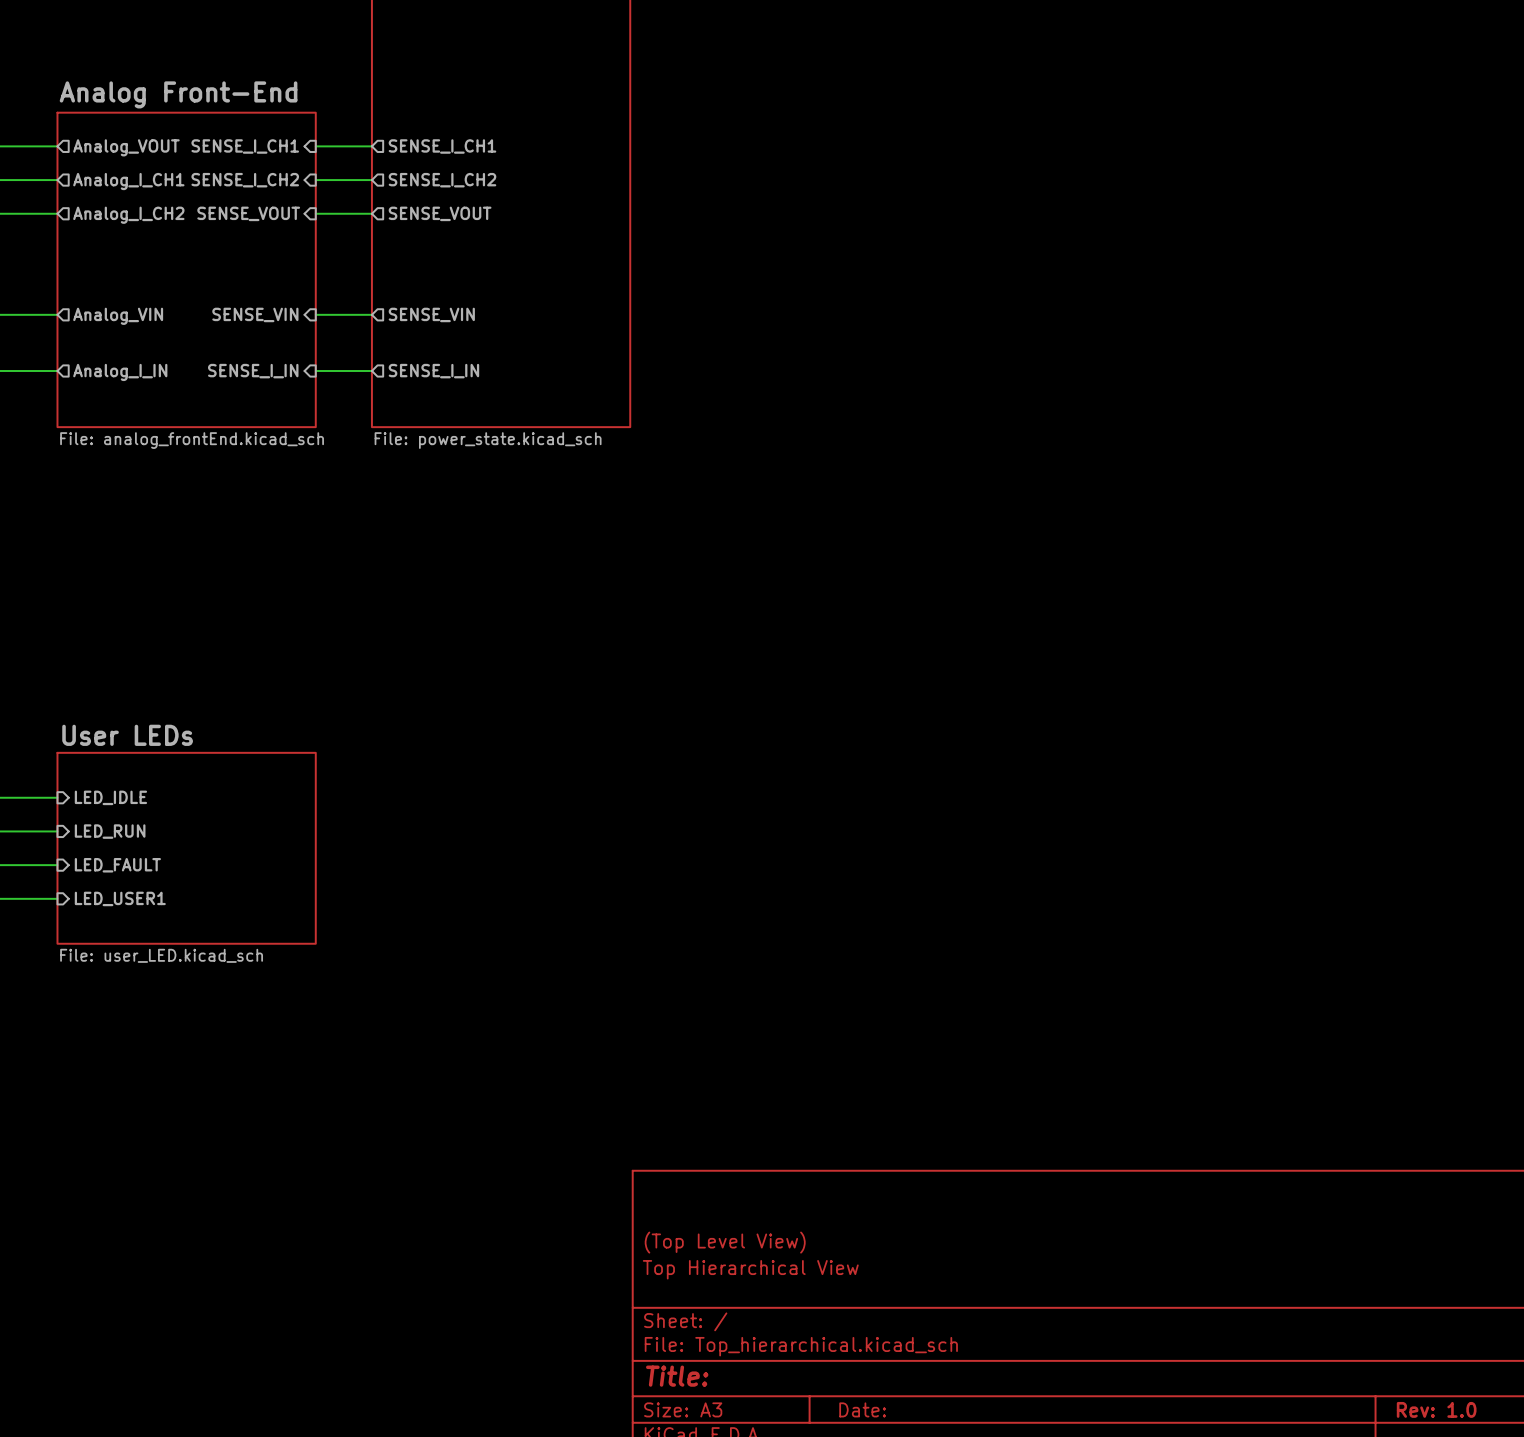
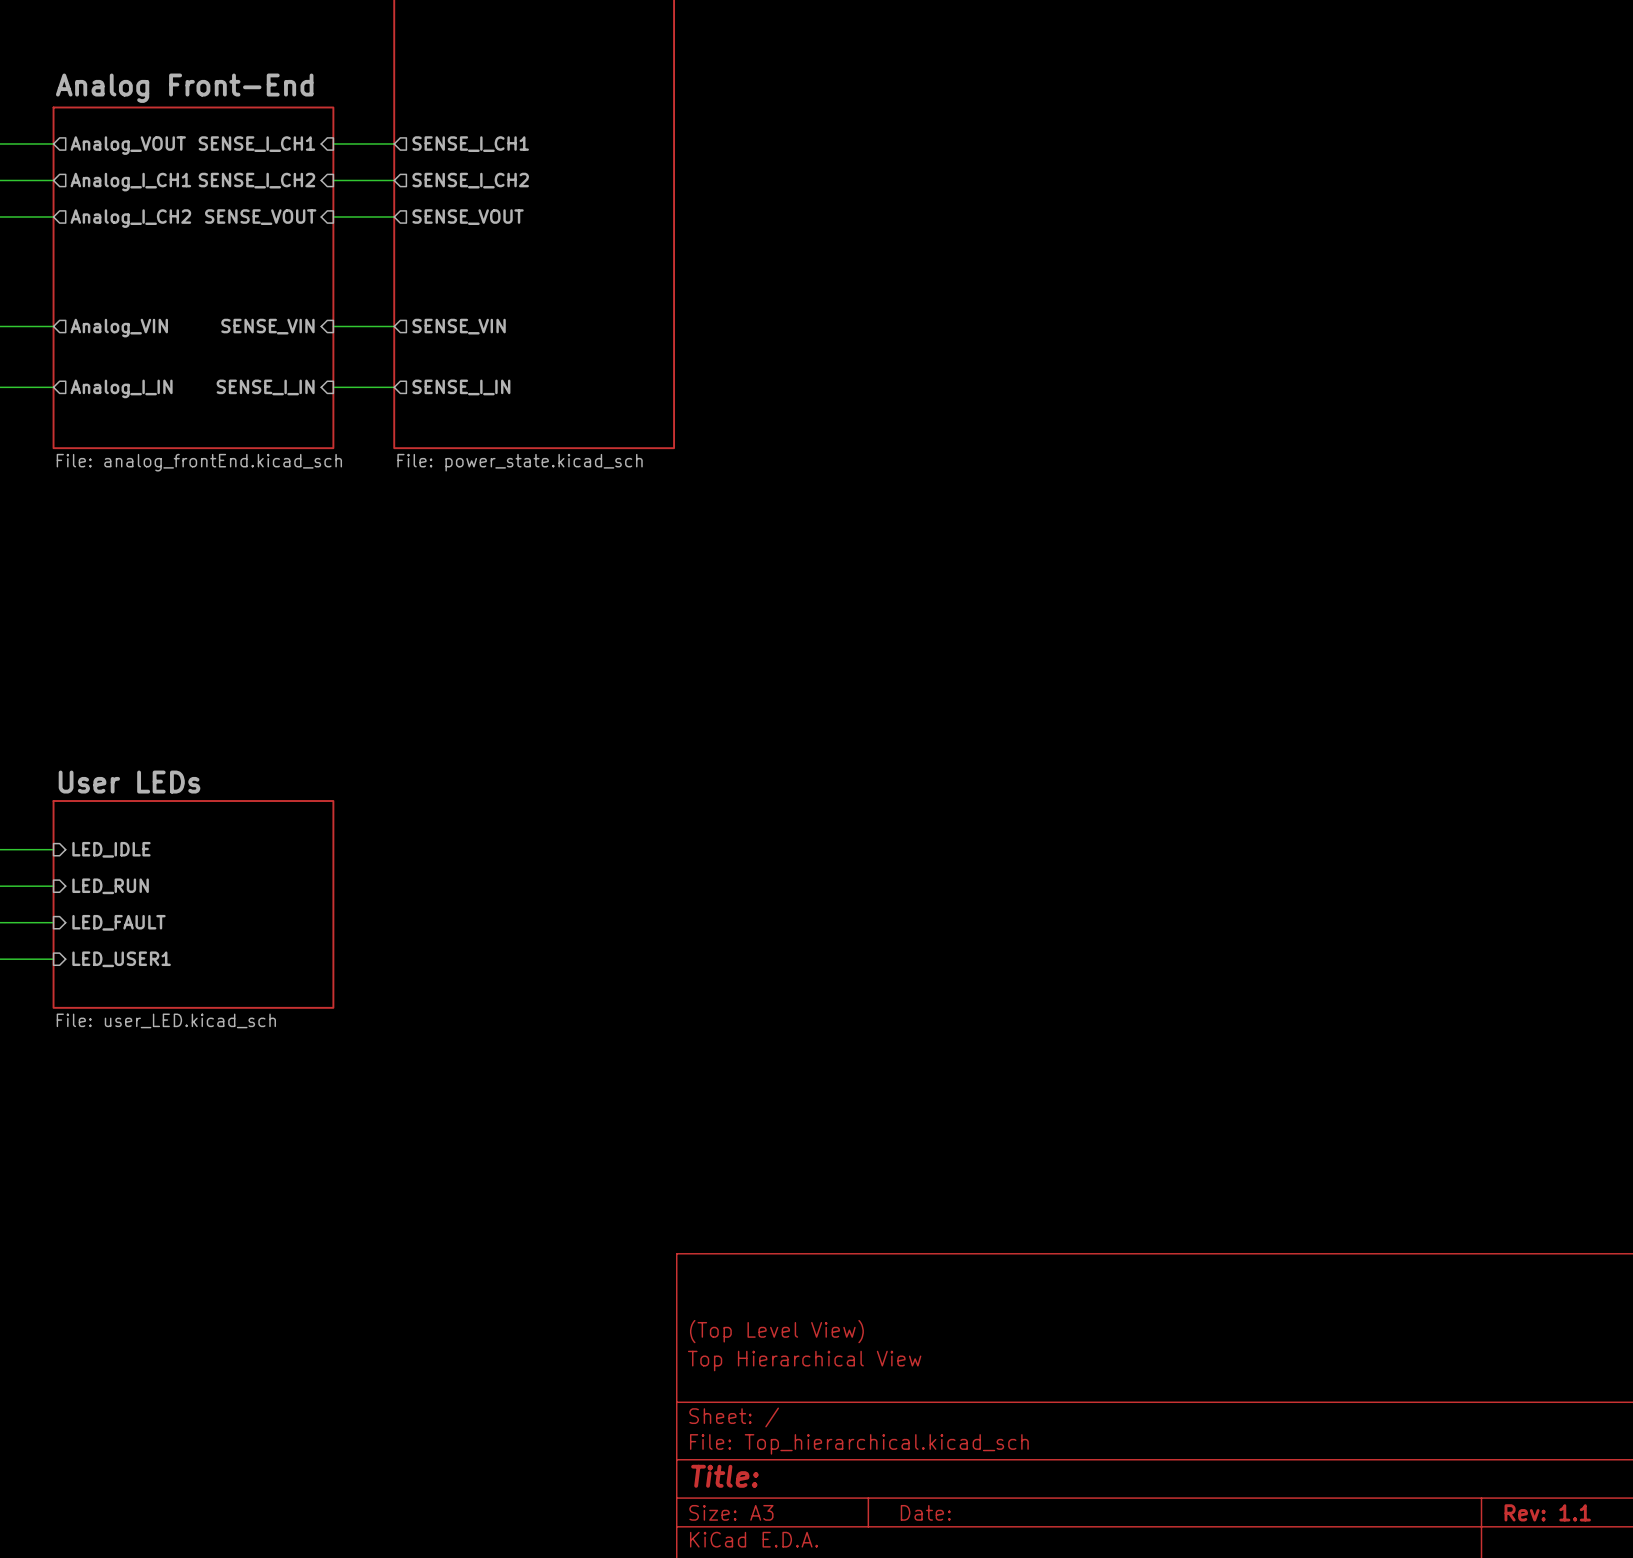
title block: Rev: 1.0 (1436, 1409) -> Rev: 1.1 (1547, 1512)

